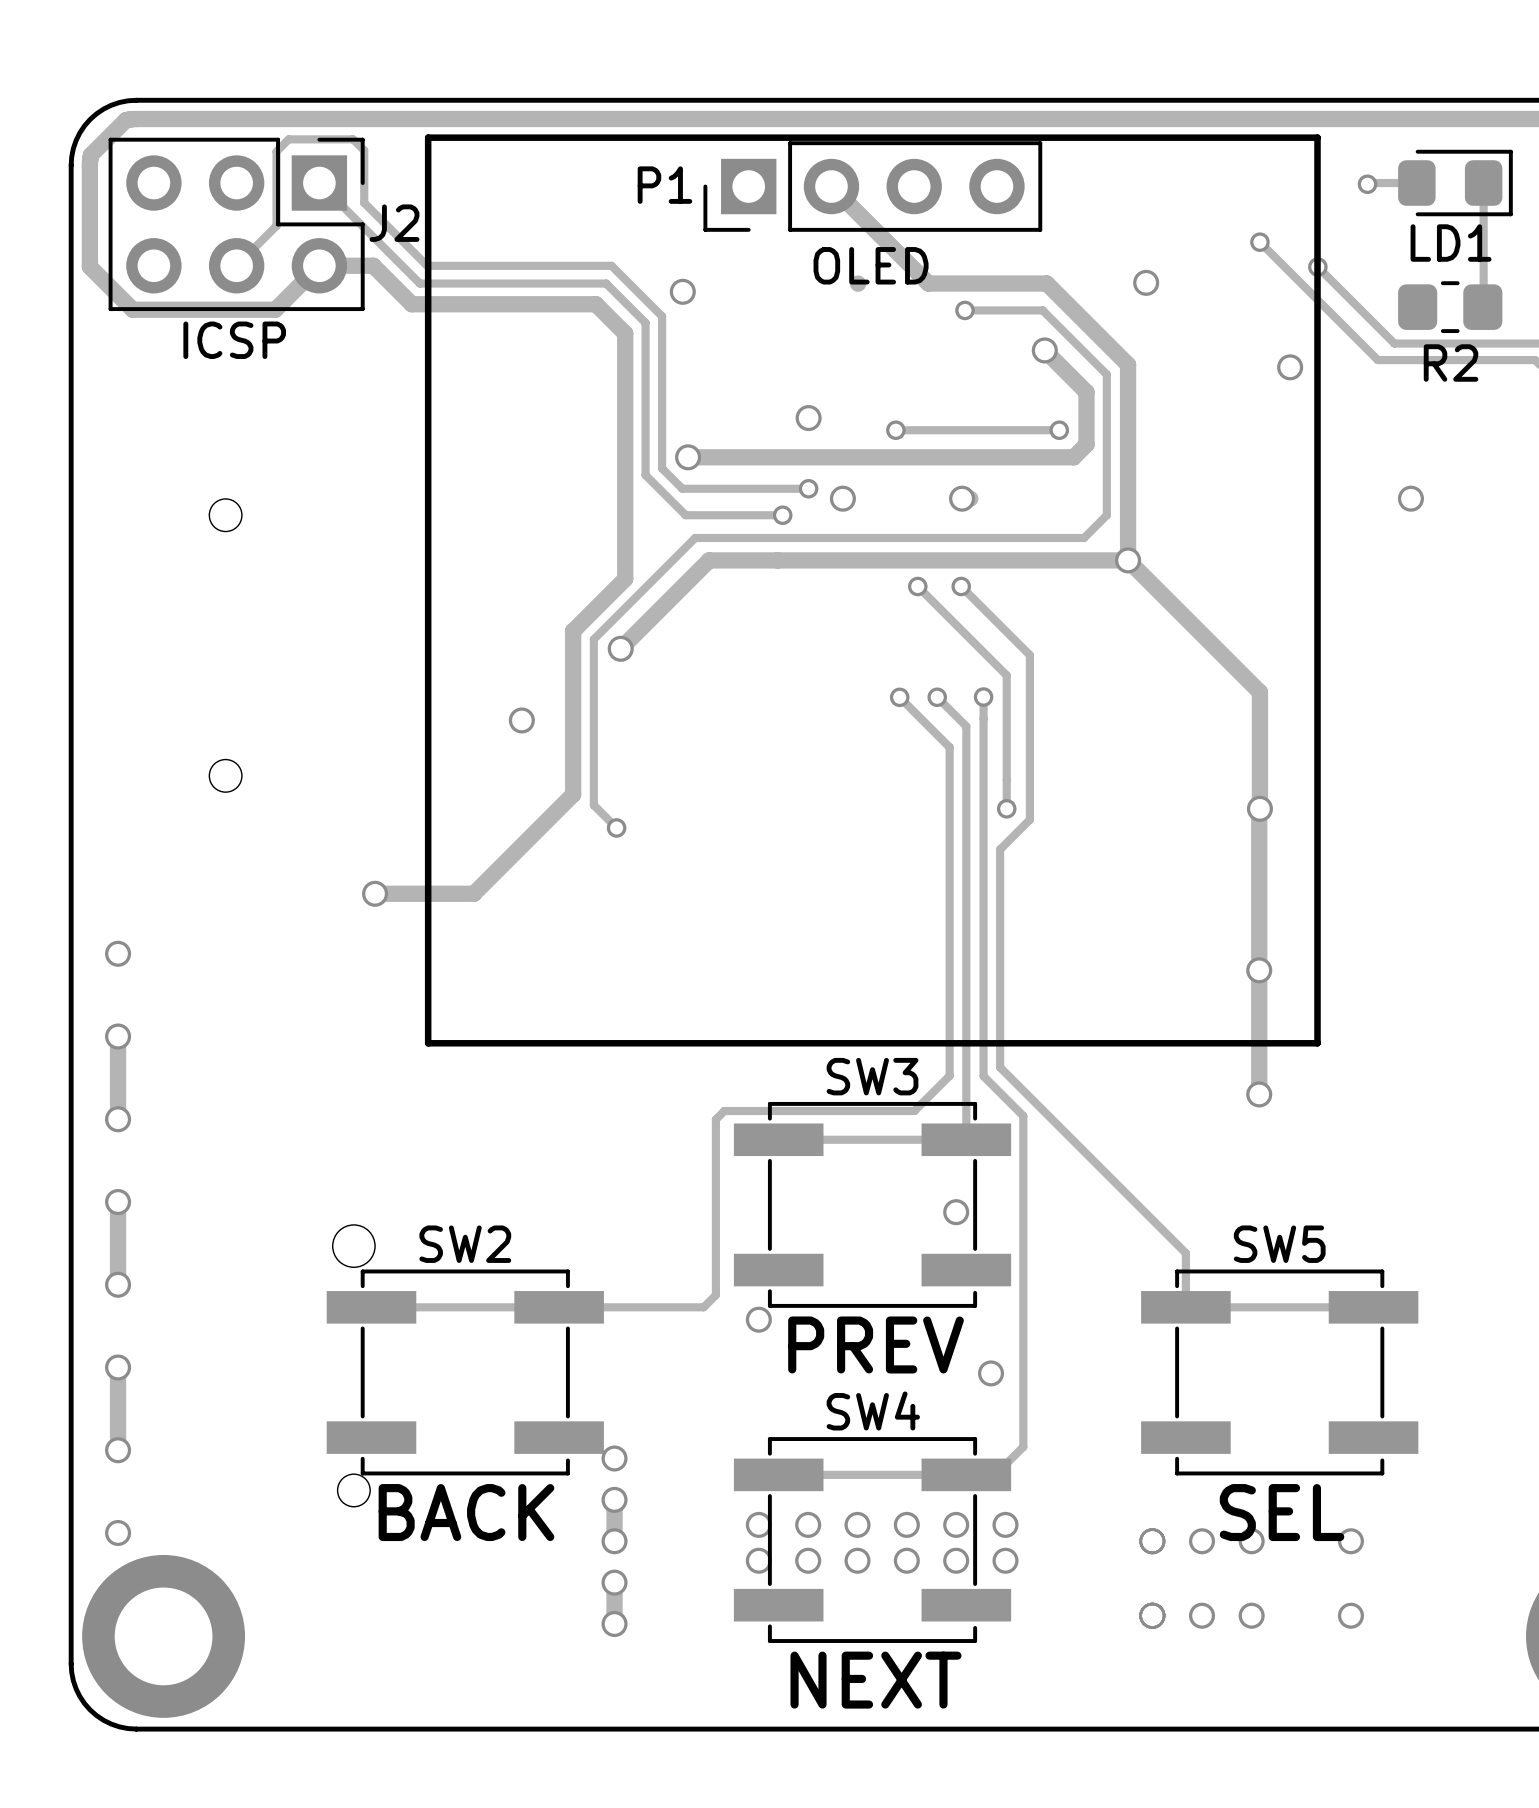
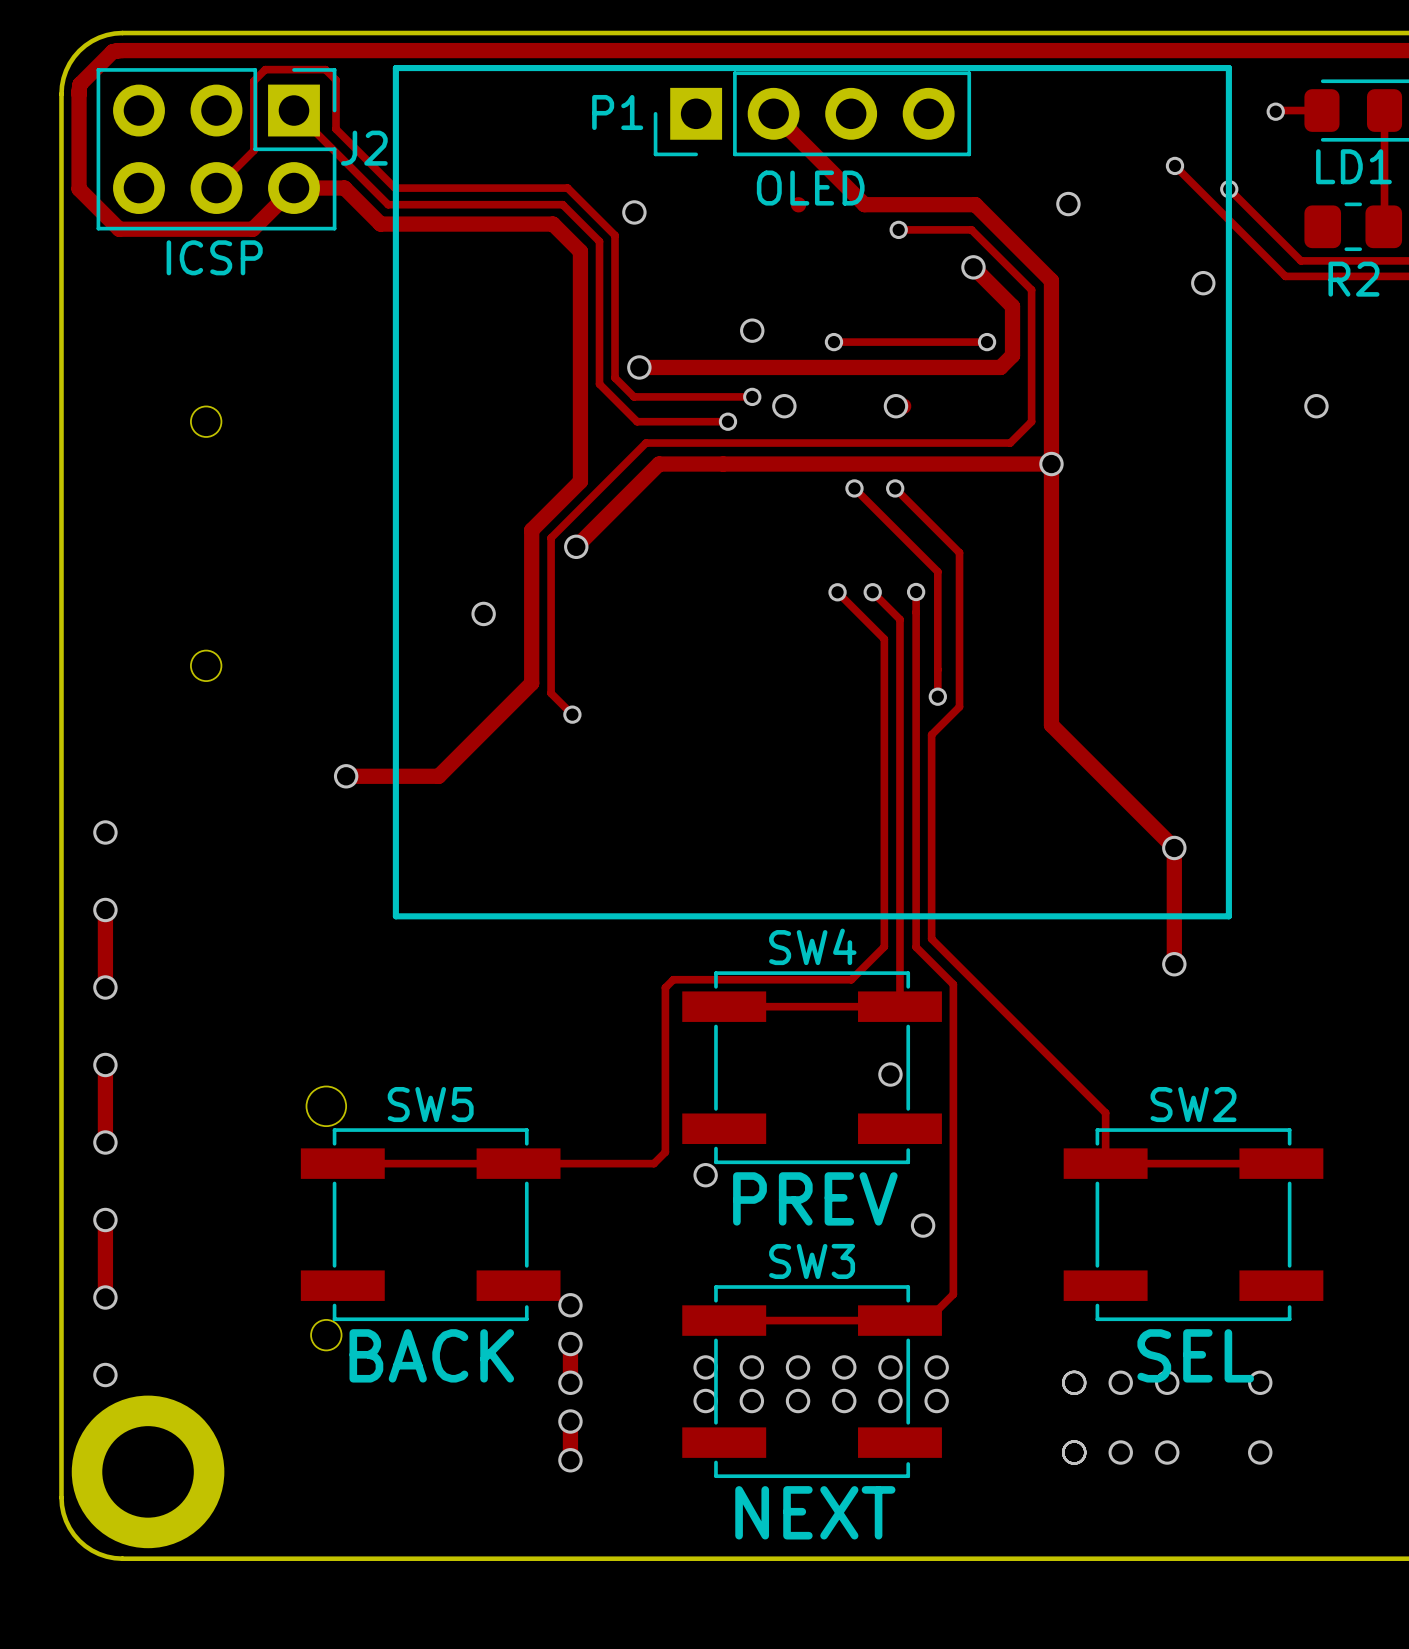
track: (1128, 560) (1259, 692) (1259, 808) -> (1051, 464) (1051, 725) (1174, 847)
track: (1259, 806) (1259, 970) -> none
via: (1259, 808) -> none
SW3 name: SW3 (872, 1076) -> SW4 (812, 946)
SW2 name: SW2 (465, 1244) -> SW5 (430, 1104)
SW5 name: SW5 (1279, 1244) -> SW2 (1193, 1104)
SW4 name: SW4 (873, 1410) -> SW3 (812, 1261)

